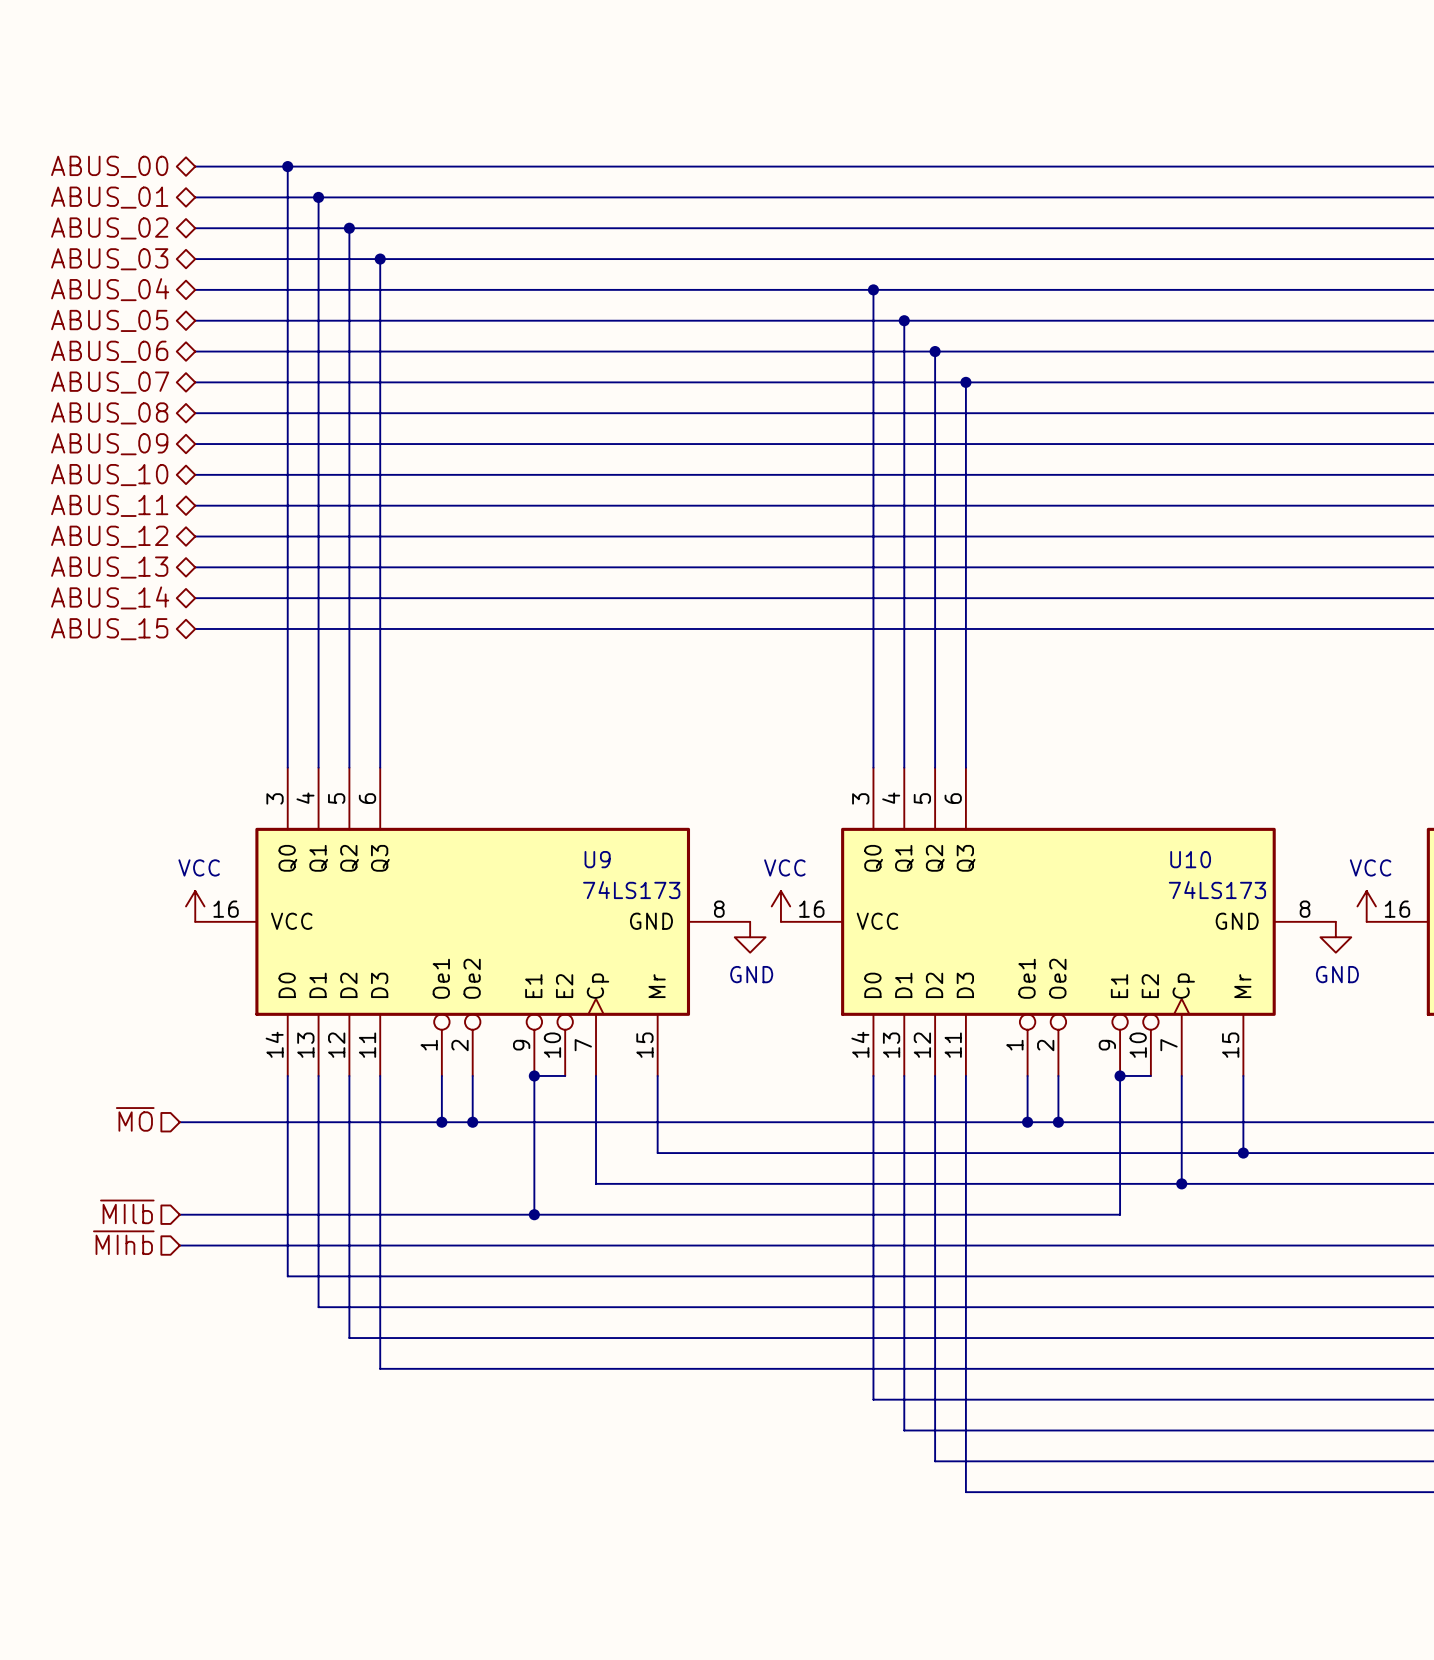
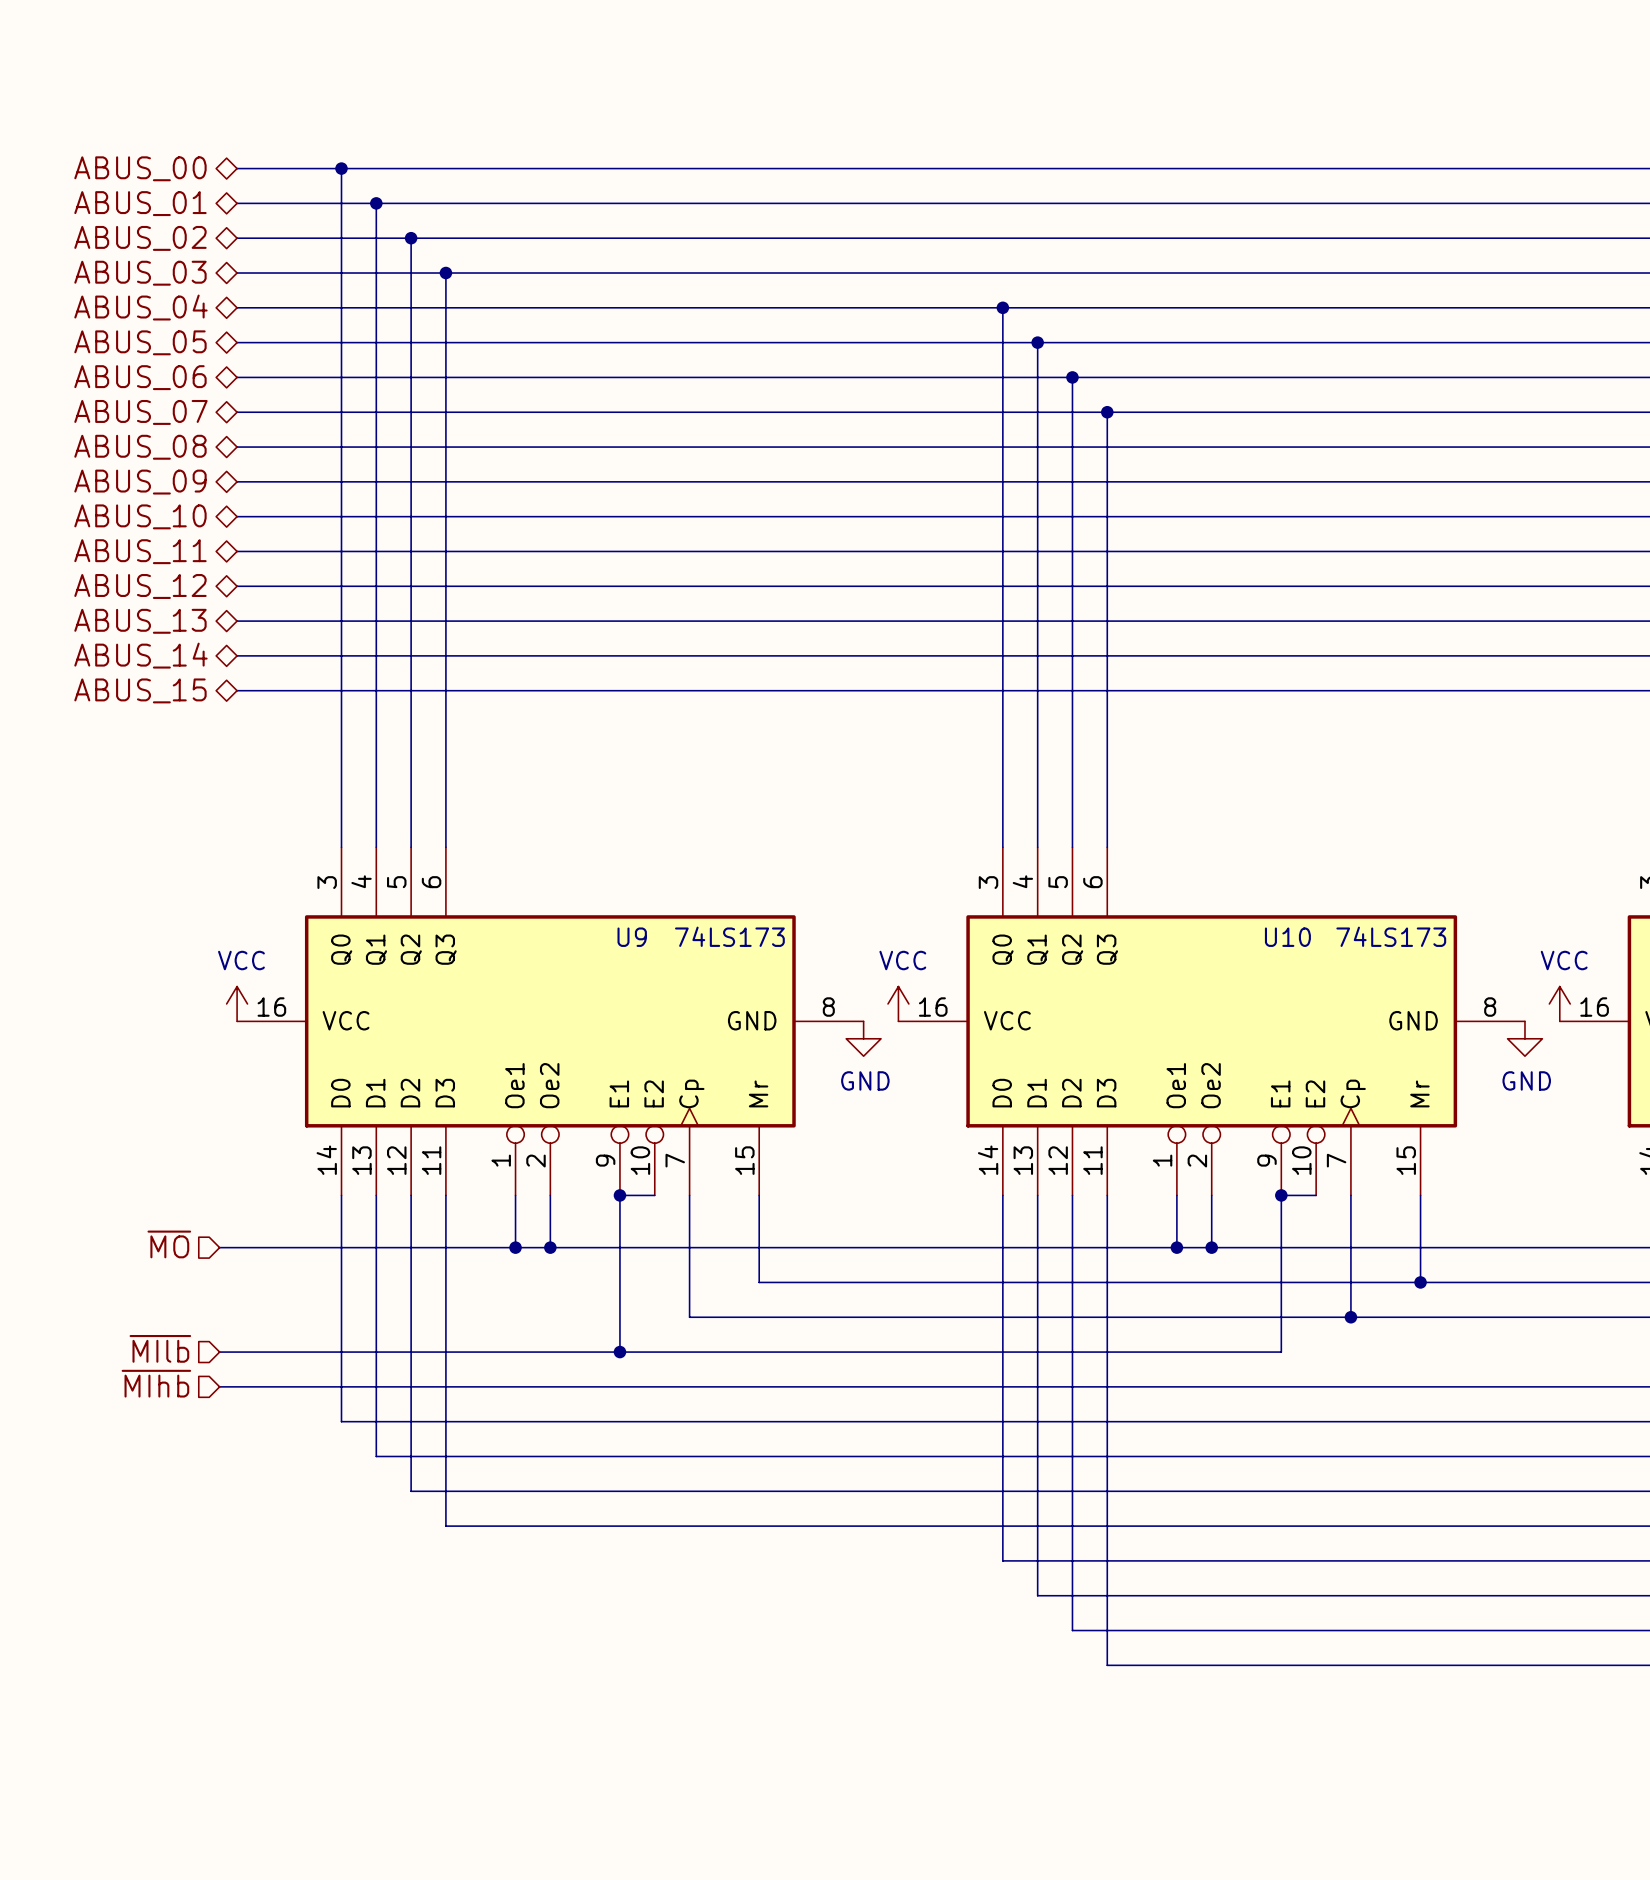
U9 name position: U9 (597, 859) -> U9 (632, 937)
U10 name position: U10 (1190, 859) -> U10 (1287, 937)
U9 value position: 74LS173 (631, 890) -> 74LS173 (729, 936)
U10 value position: 74LS173 (1217, 890) -> 74LS173 (1391, 936)

